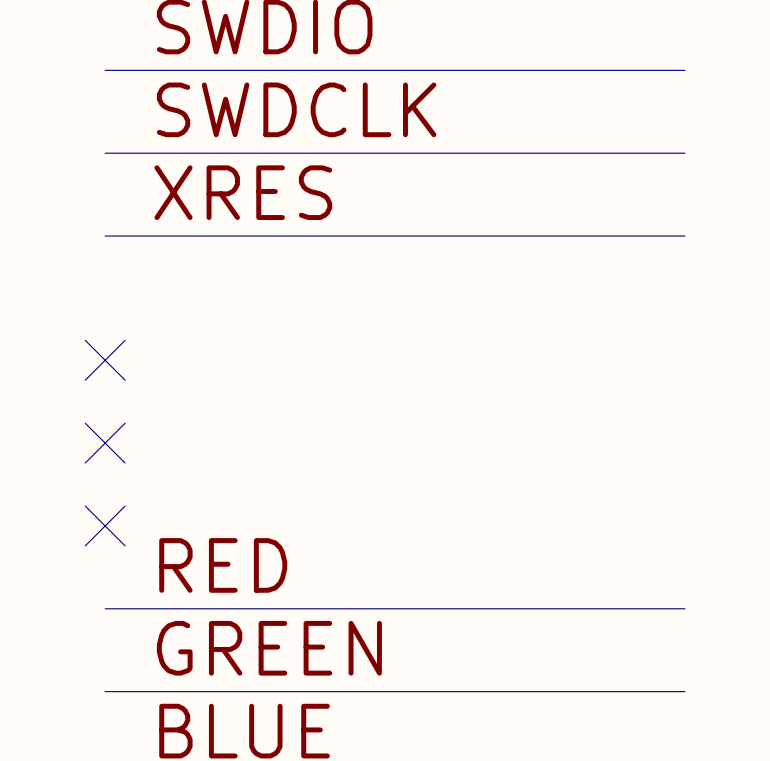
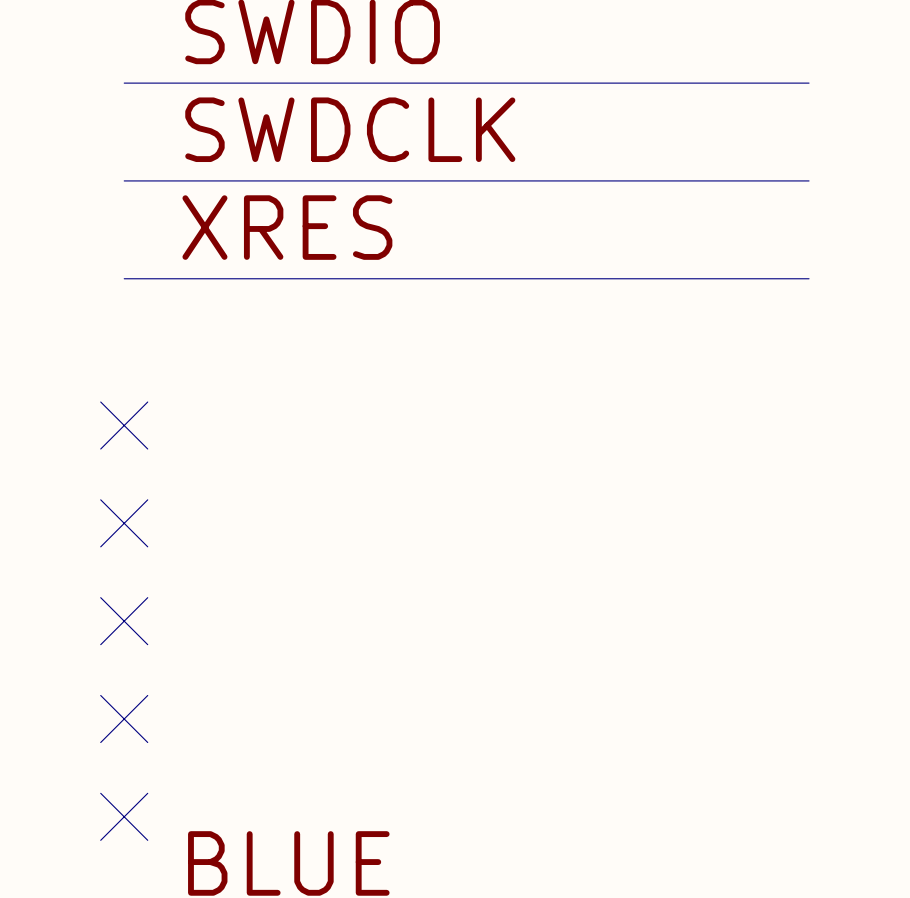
label: RED (223, 565) -> none
wire: (105, 608) (685, 608) -> none
no-connect mark: none -> (124, 719)
label: GREEN (269, 648) -> none
wire: (105, 691) (685, 691) -> none
no-connect mark: none -> (124, 816)

